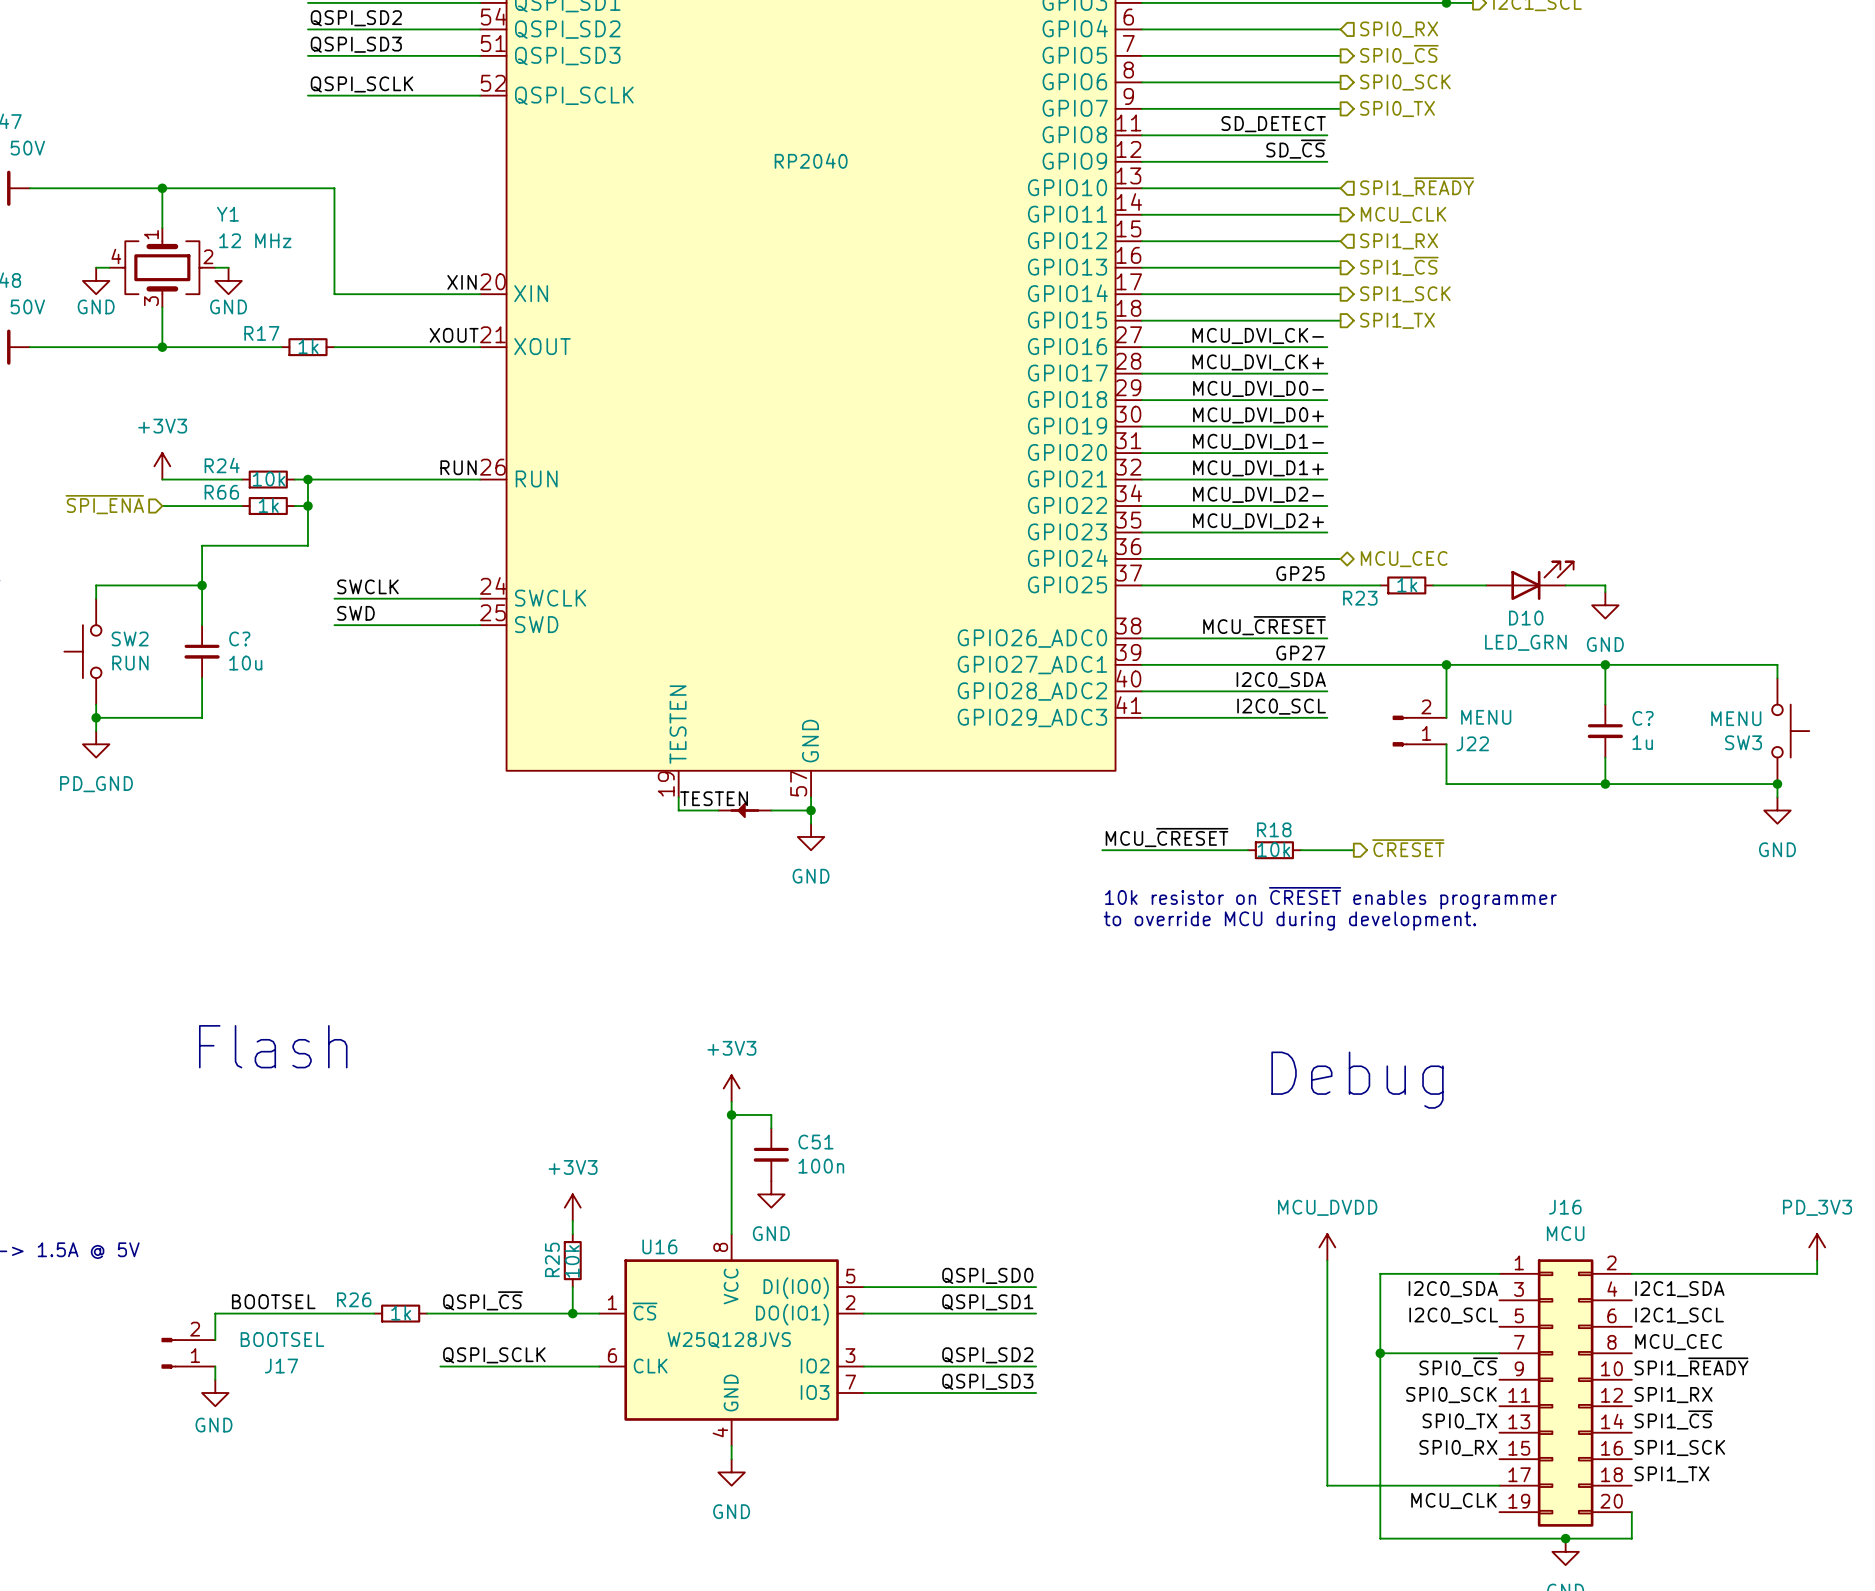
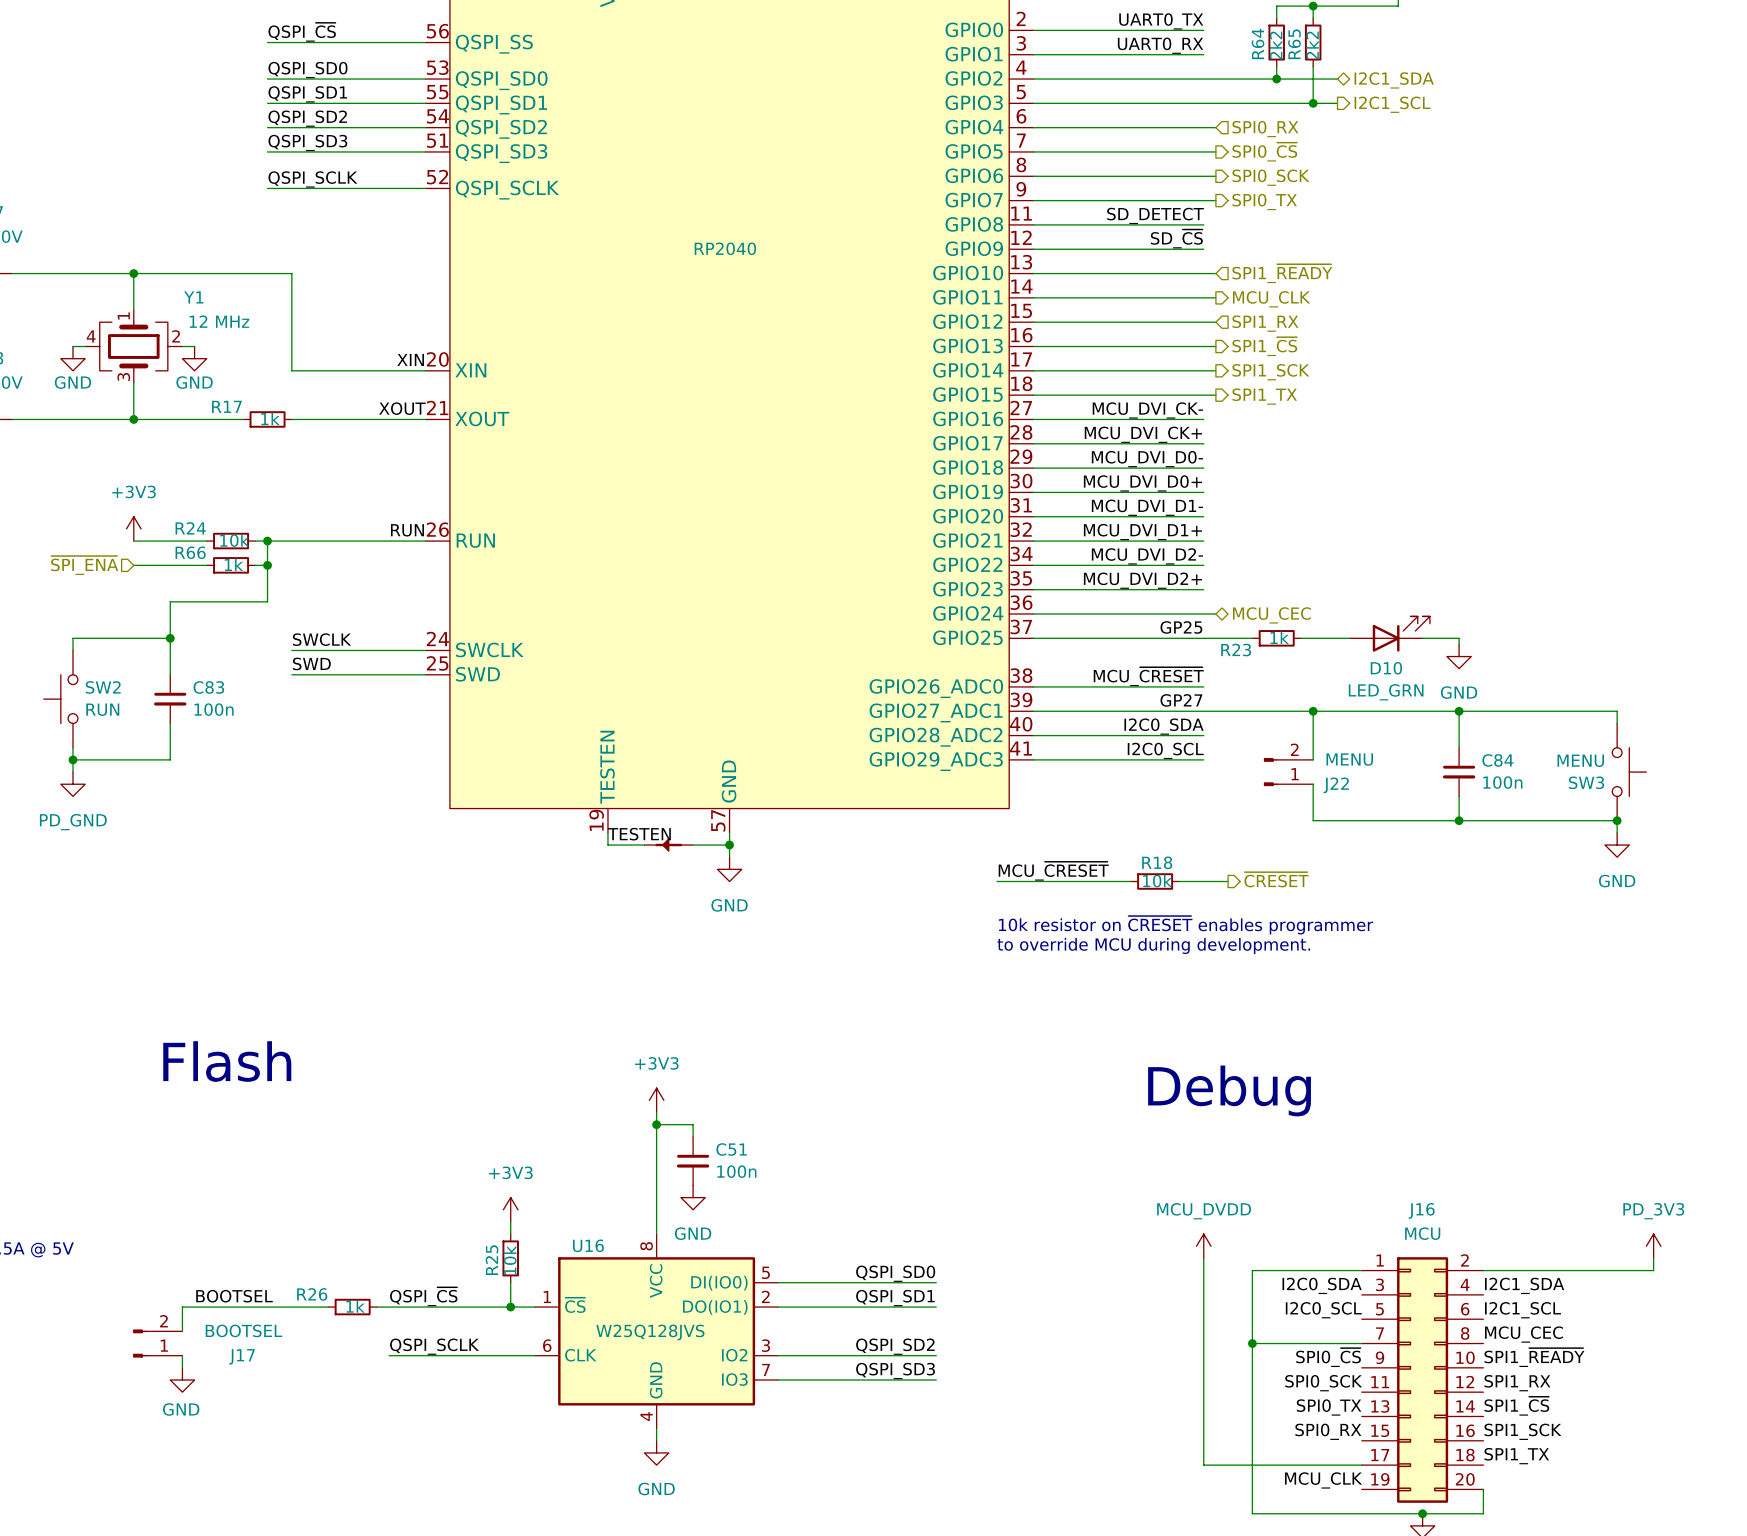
C? name: C? (239, 638) -> C83 (208, 687)
C? value: 10u (245, 663) -> 100n (214, 709)
C? name: C? (1643, 718) -> C84 (1497, 760)
C? value: 1u (1642, 742) -> 100n (1502, 782)

